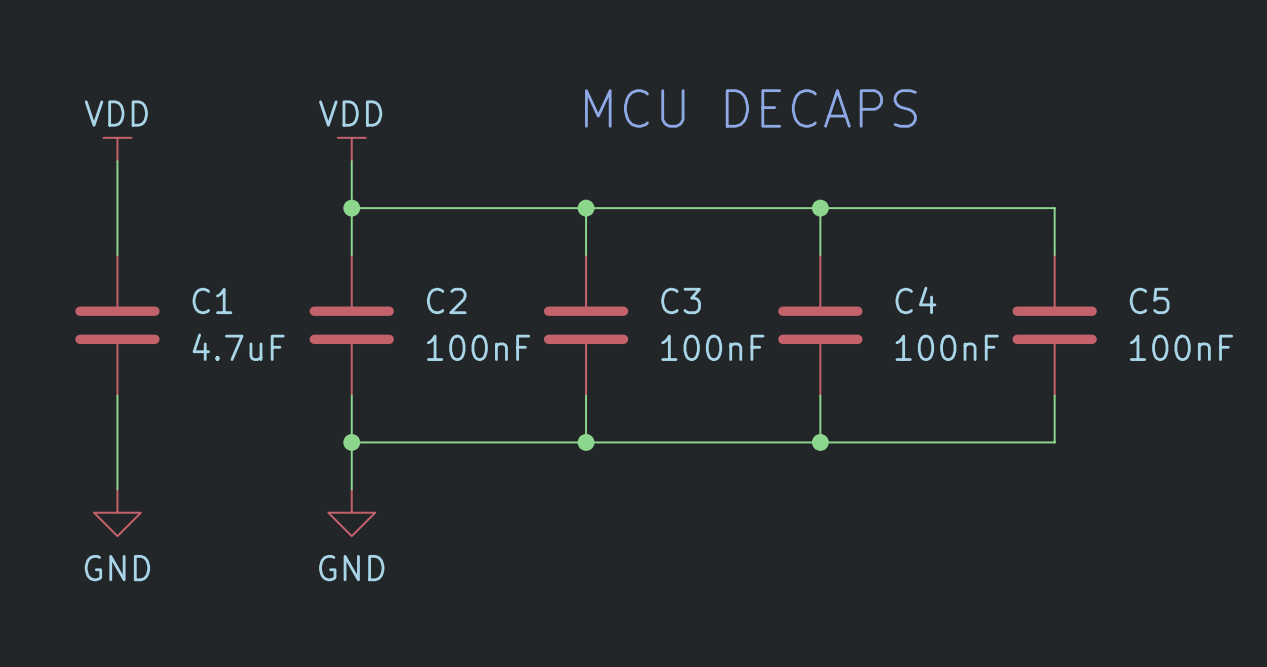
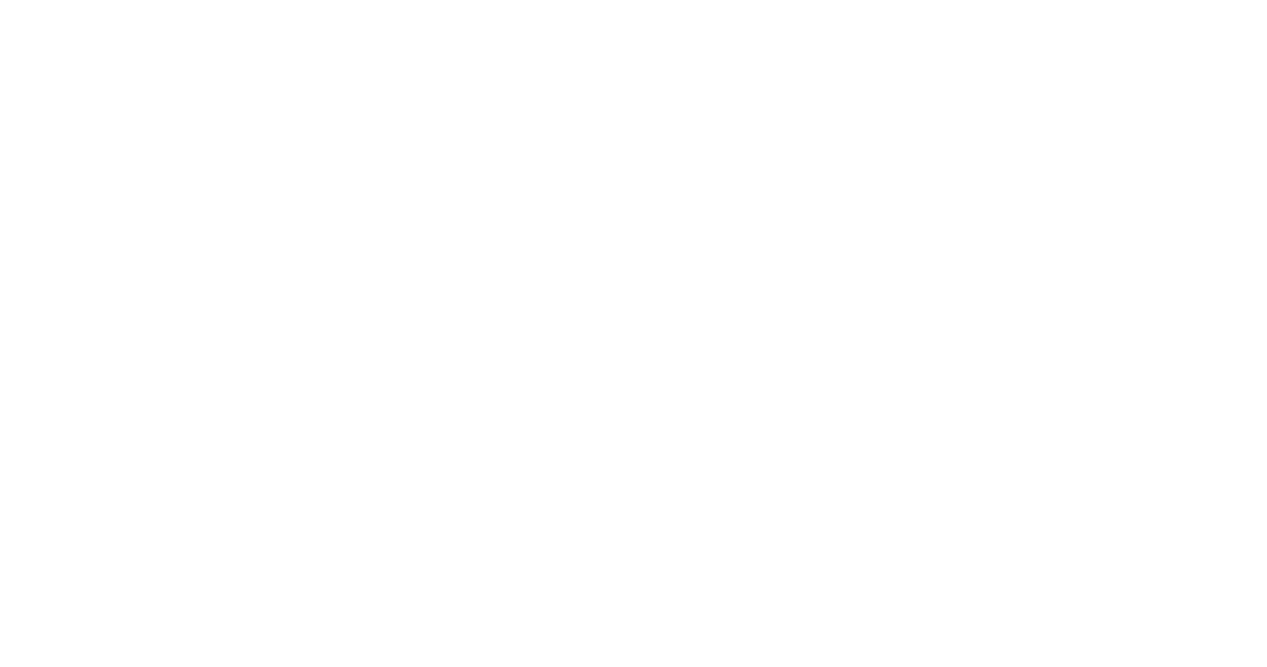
text: MCU DECAPS (750, 108) -> none
power symbol: VDD (117, 149) -> none
power symbol: VDD (351, 149) -> none
wire: (117, 161) (117, 254) -> none
wire: (351, 161) (351, 254) -> none
wire: (351, 208) (1054, 208) (1054, 254) -> none
junction: (351, 208) -> none
wire: (586, 208) (586, 254) -> none
junction: (586, 208) -> none
wire: (820, 208) (820, 254) -> none
junction: (820, 208) -> none
C1: 4.7uF (117, 325) -> none
C2: 100nF (351, 325) -> none
C3: 100nF (586, 325) -> none
C4: 100nF (820, 325) -> none
C5: 100nF (1054, 325) -> none
wire: (117, 395) (117, 489) -> none
wire: (351, 395) (351, 489) -> none
wire: (586, 395) (586, 442) -> none
wire: (820, 395) (820, 442) -> none
wire: (1054, 395) (1054, 442) (351, 442) -> none
junction: (351, 442) -> none
junction: (586, 442) -> none
junction: (820, 442) -> none
power symbol: GND (117, 512) -> none
power symbol: GND (351, 512) -> none

